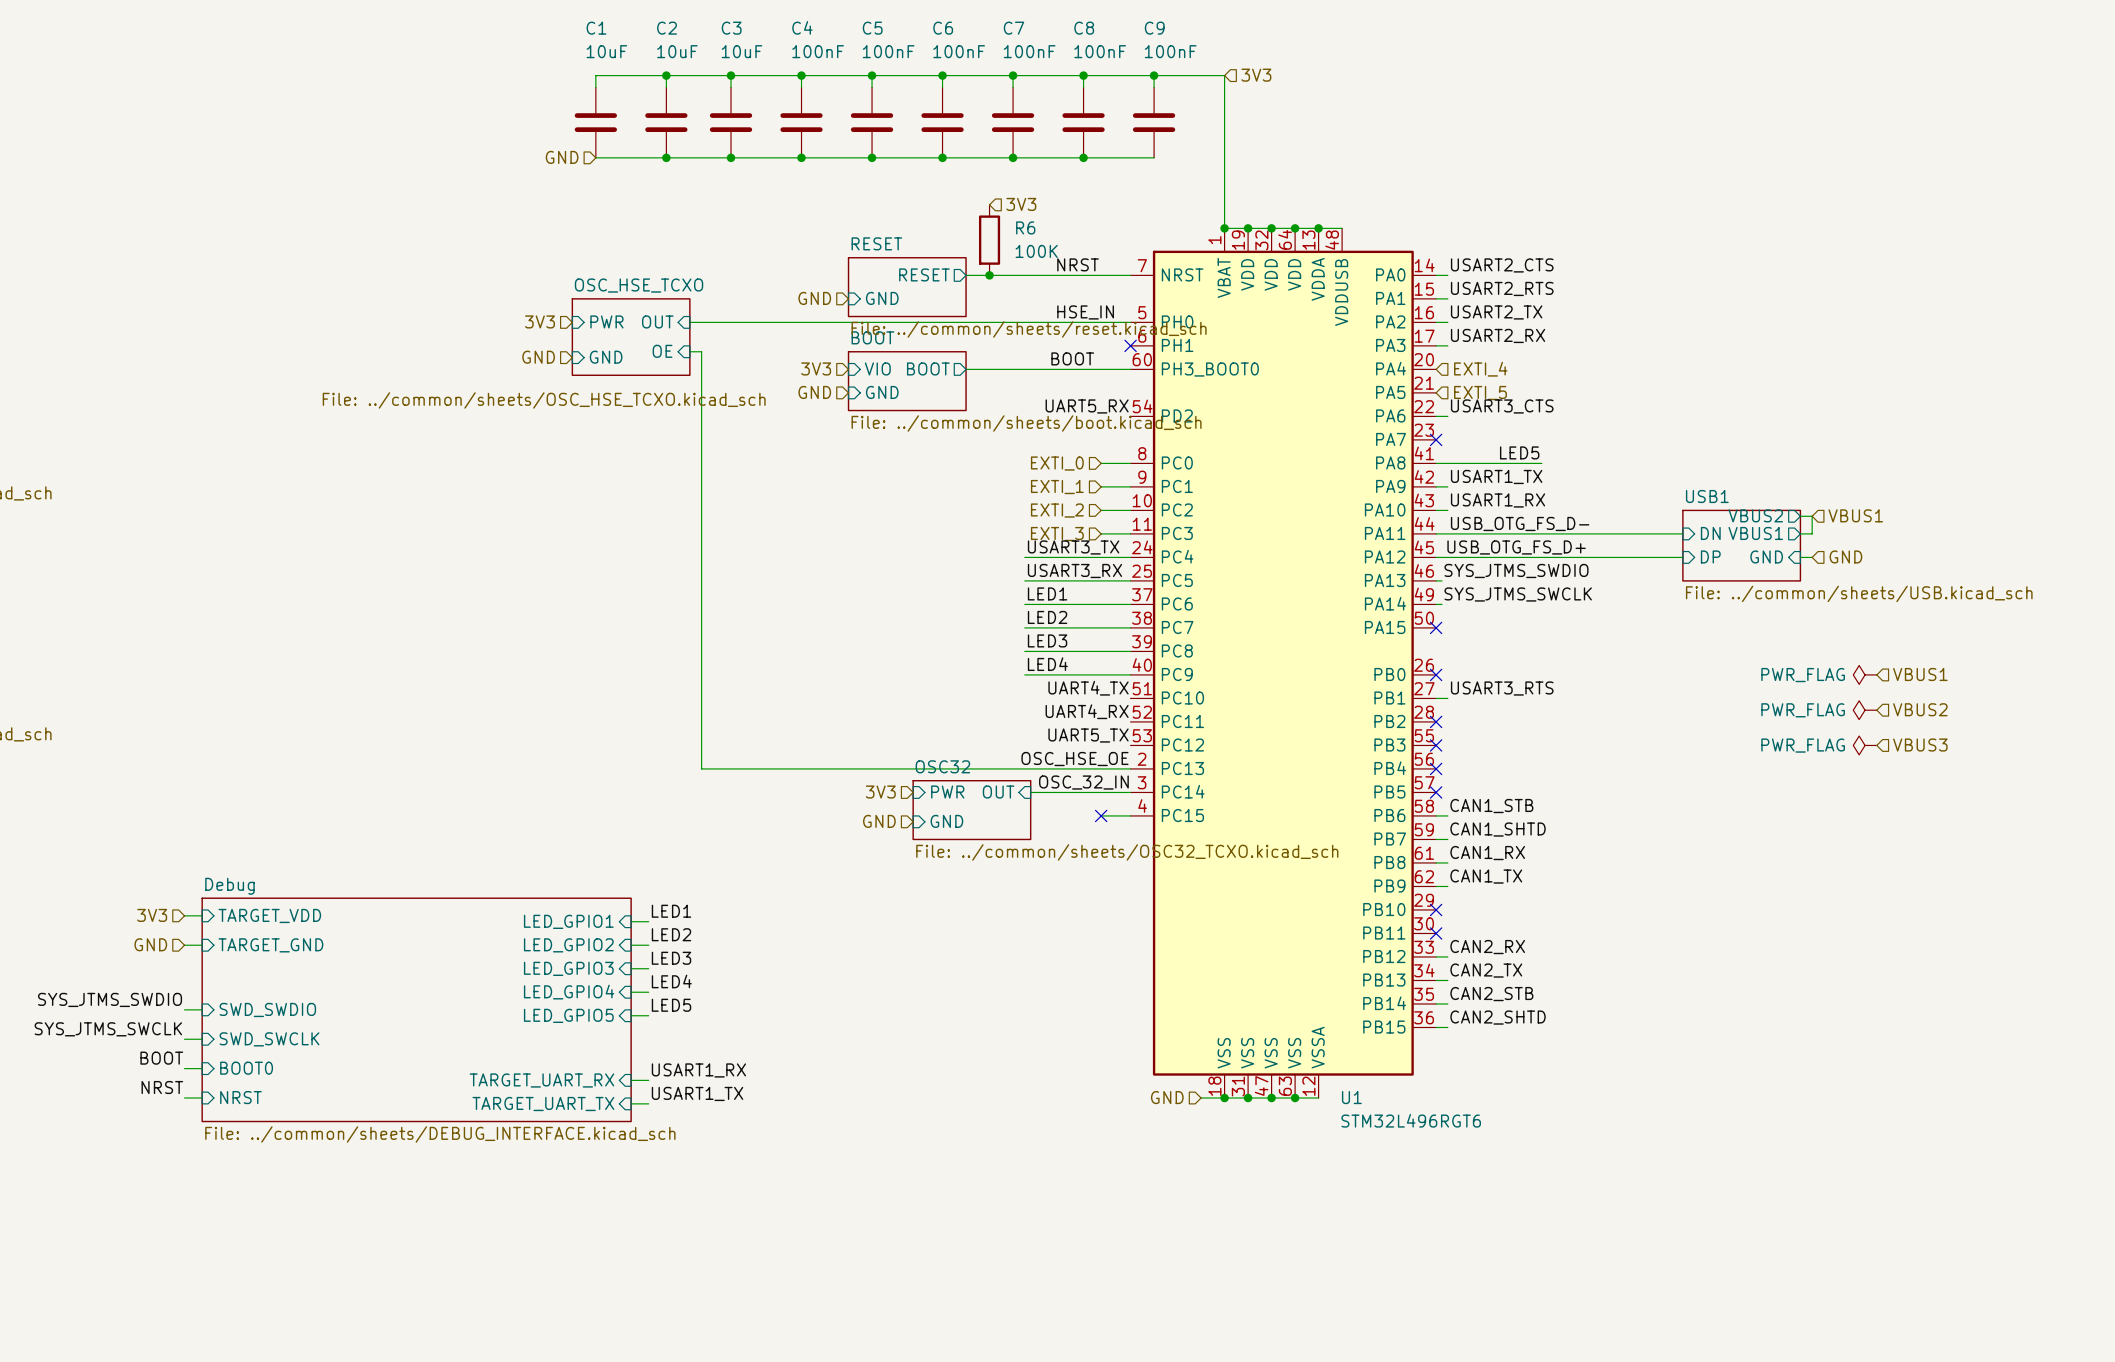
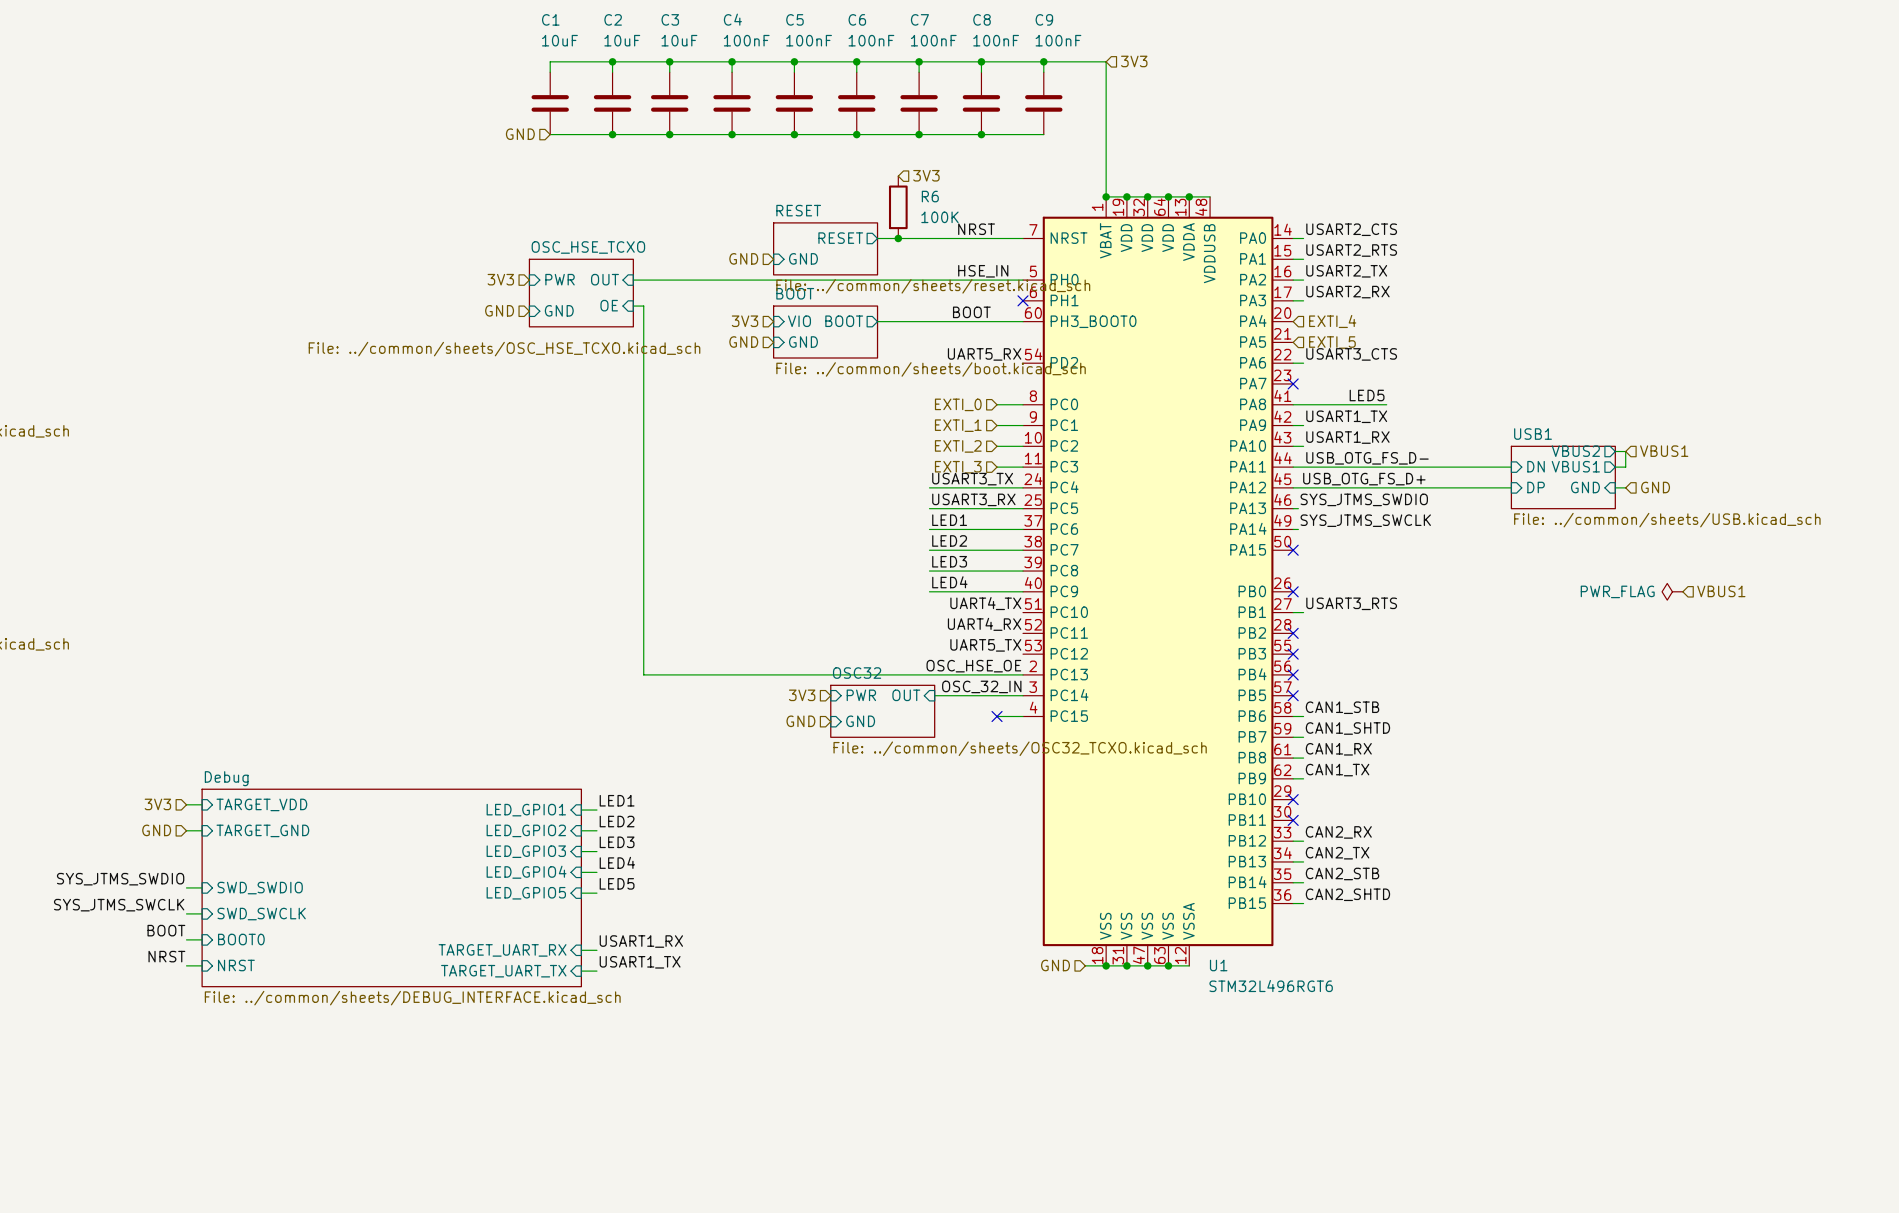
hierarchical label: VBUS2 (1920, 709) -> none
power symbol: PWR_FLAG (1865, 710) -> none
power symbol: PWR_FLAG (1865, 745) -> none
hierarchical label: VBUS3 (1920, 745) -> none

